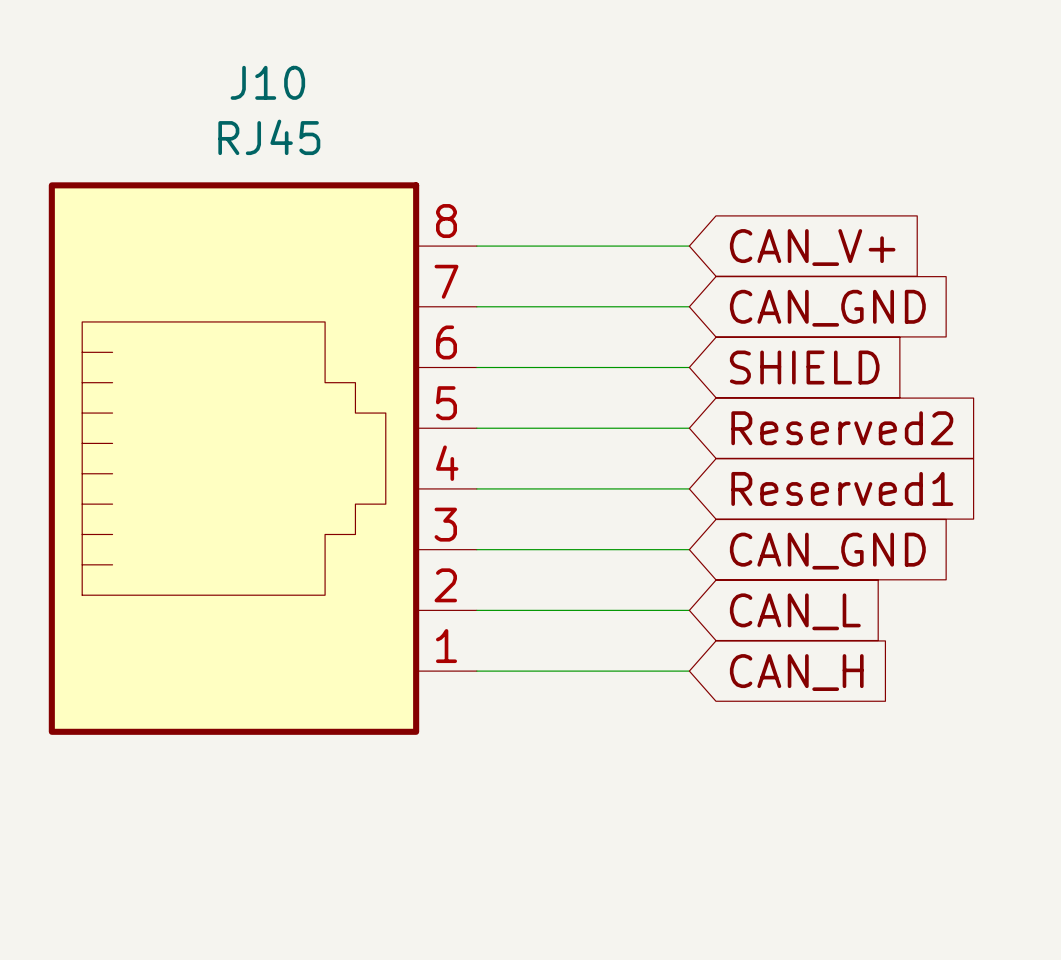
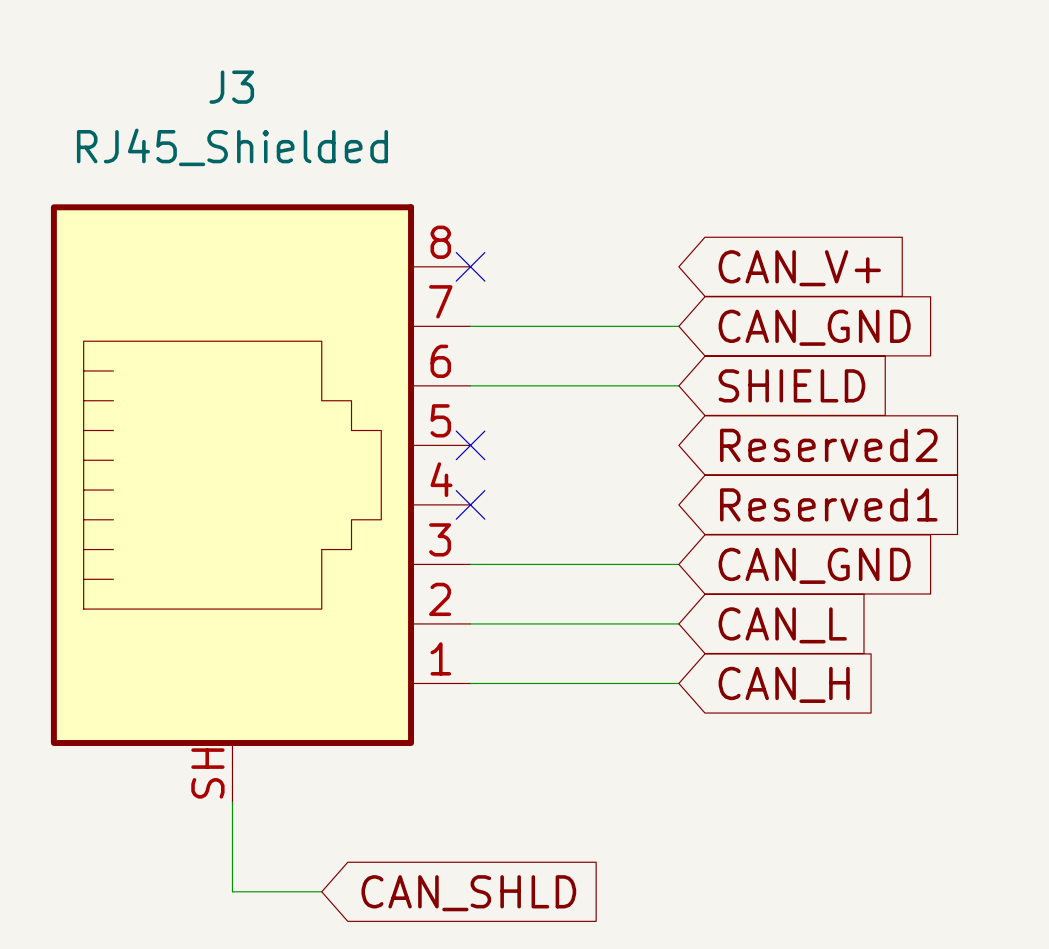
wire: (476, 246) (689, 246) -> none
no-connect mark: none -> (470, 266)
wire: (476, 428) (689, 428) -> none
no-connect mark: none -> (470, 445)
J10: RJ45 (262, 458) -> none
J3: none -> RJ45_Shielded (260, 503)
wire: (476, 488) (689, 488) -> none
no-connect mark: none -> (470, 504)
wire: none -> (232, 802) (232, 891) (321, 891)
global label: none -> CAN_SHLD (468, 893)

